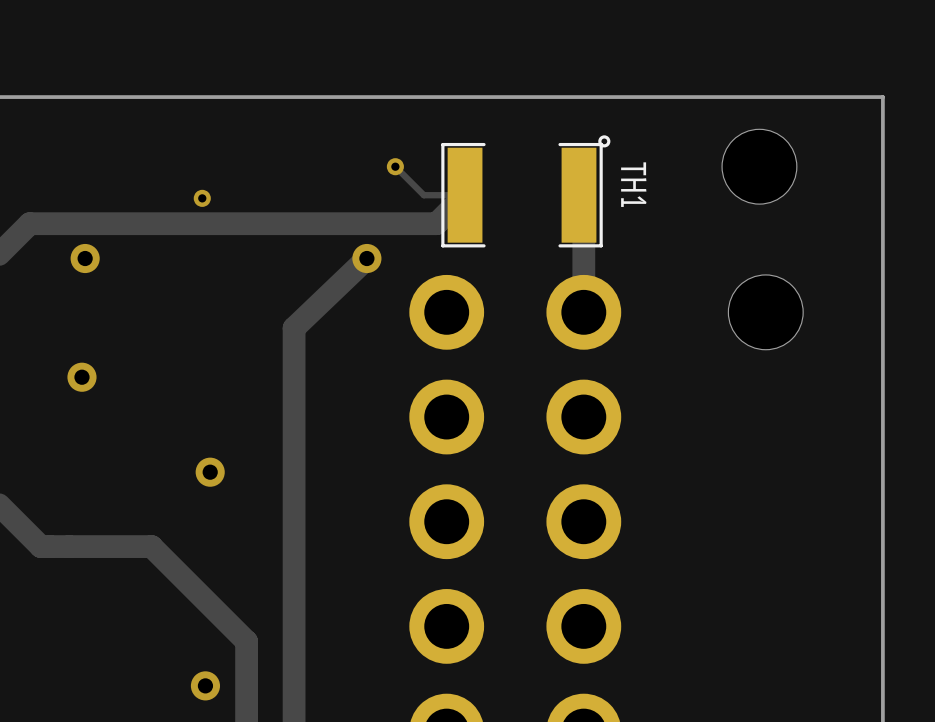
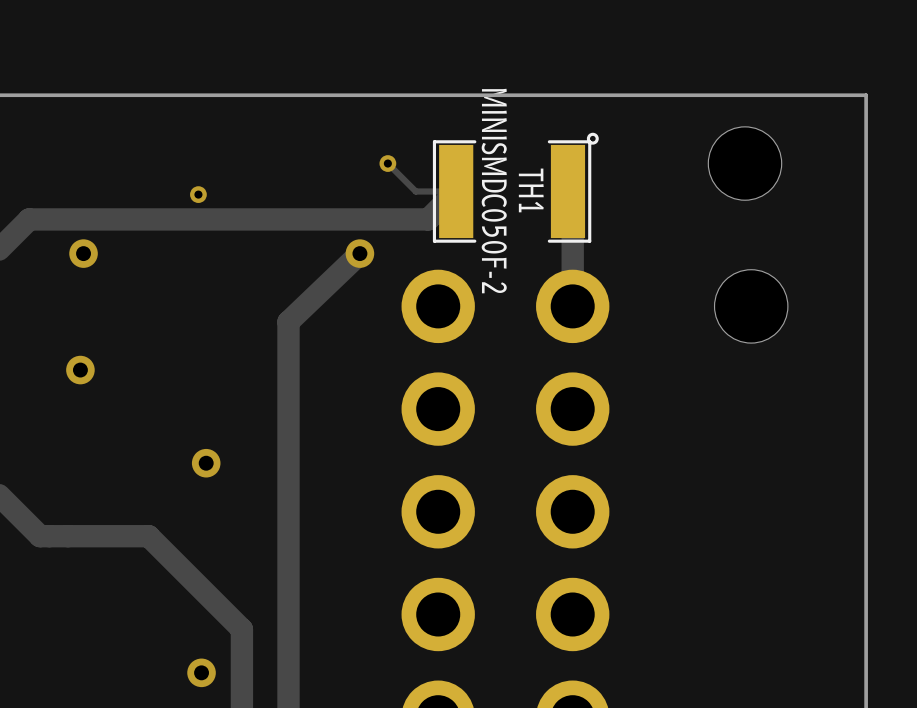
TH1 name position: TH1 (633, 184) -> TH1 (531, 190)
TH1 value: none -> MINISMDC050F-2 (494, 191)

